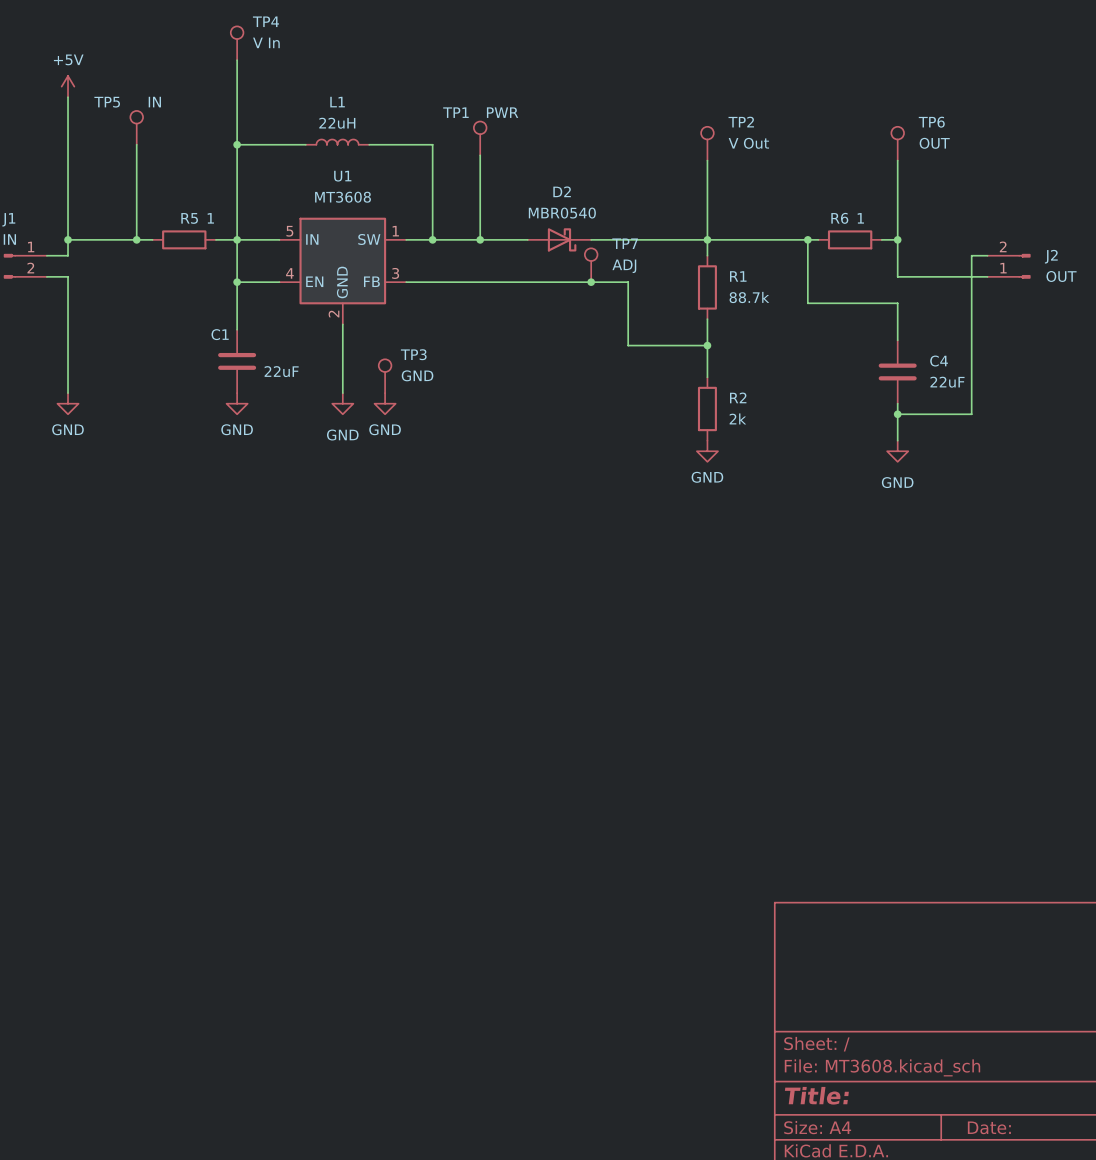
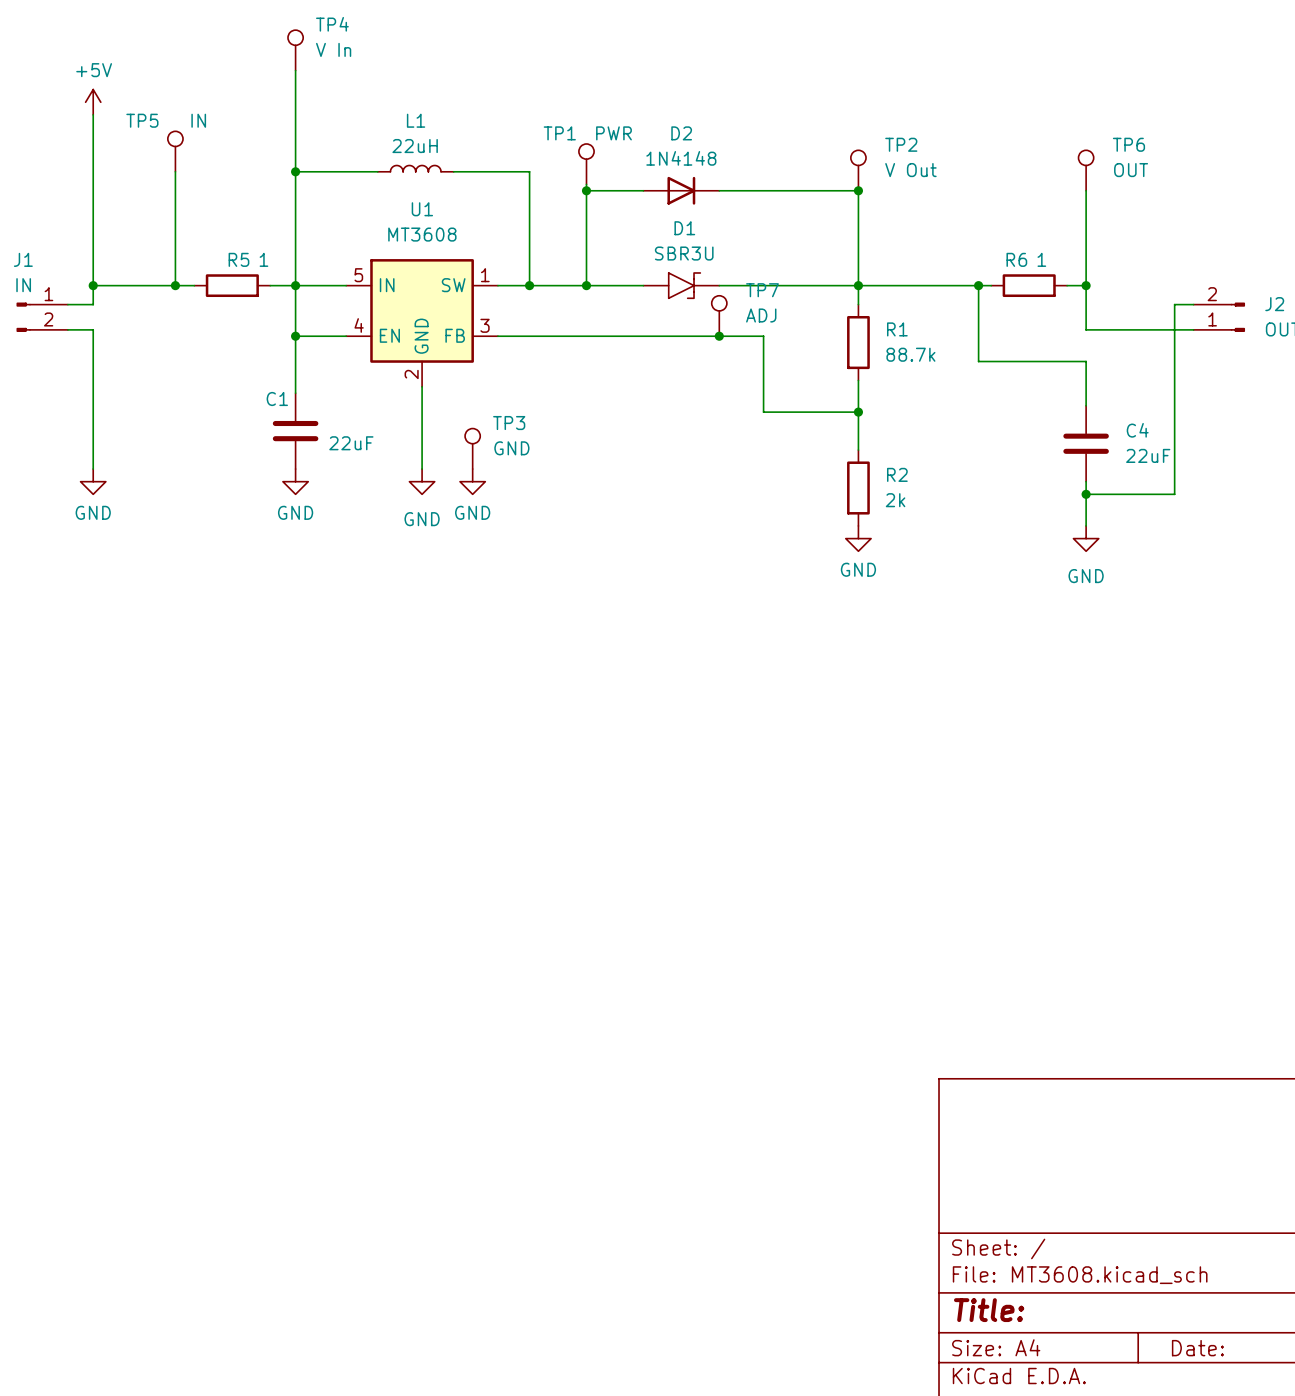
wire: none -> (586, 190) (643, 190)
junction: none -> (586, 190)
wire: none -> (719, 190) (858, 190)
junction: none -> (858, 190)
D2 value: MBR0540 (562, 213) -> 1N4148 (681, 158)
D2 symbol: [527, 228, 592, 252] -> [643, 176, 720, 205]
D1: none -> SBR3U (681, 285)

